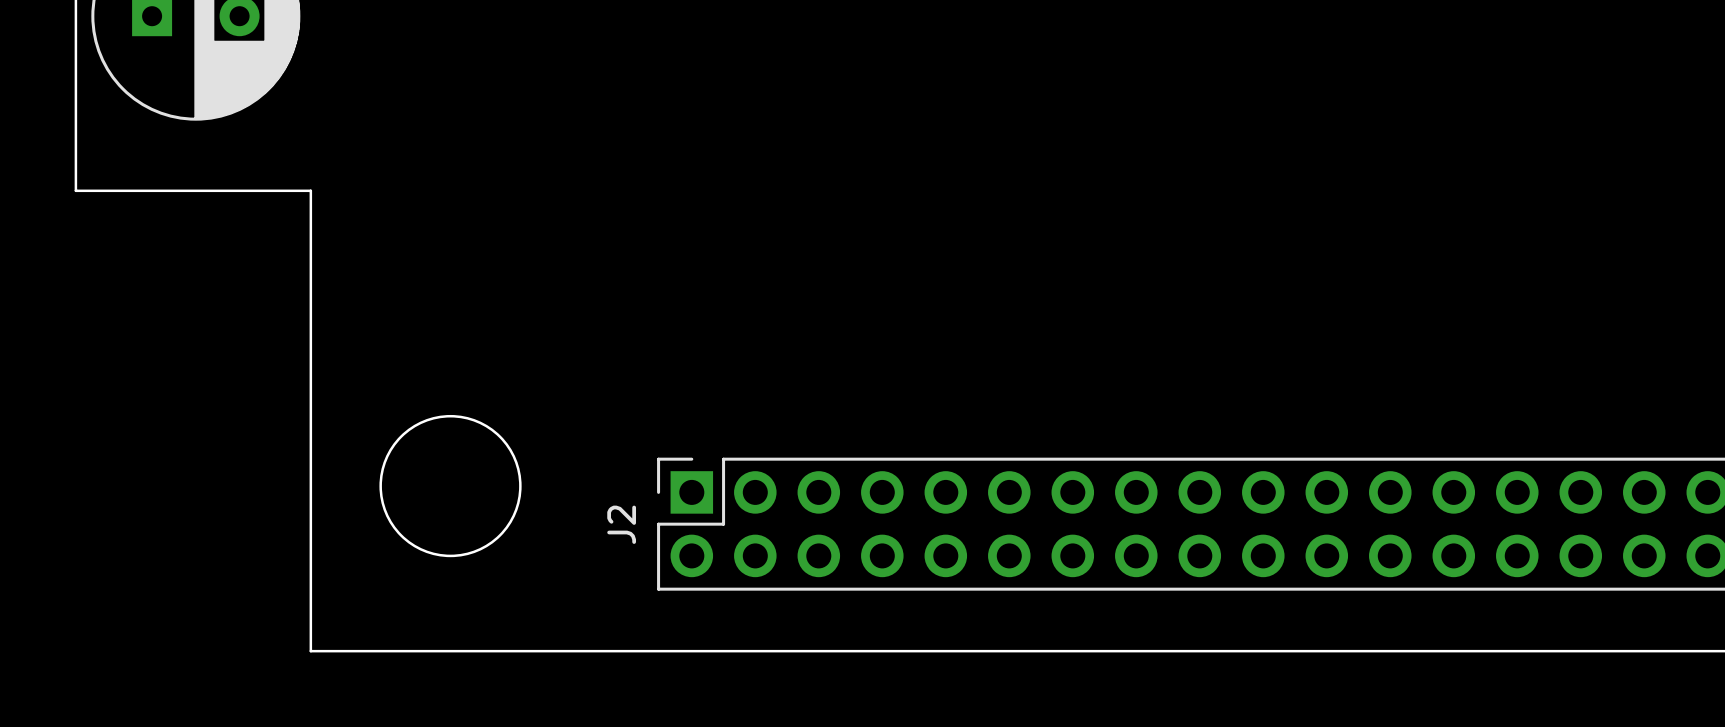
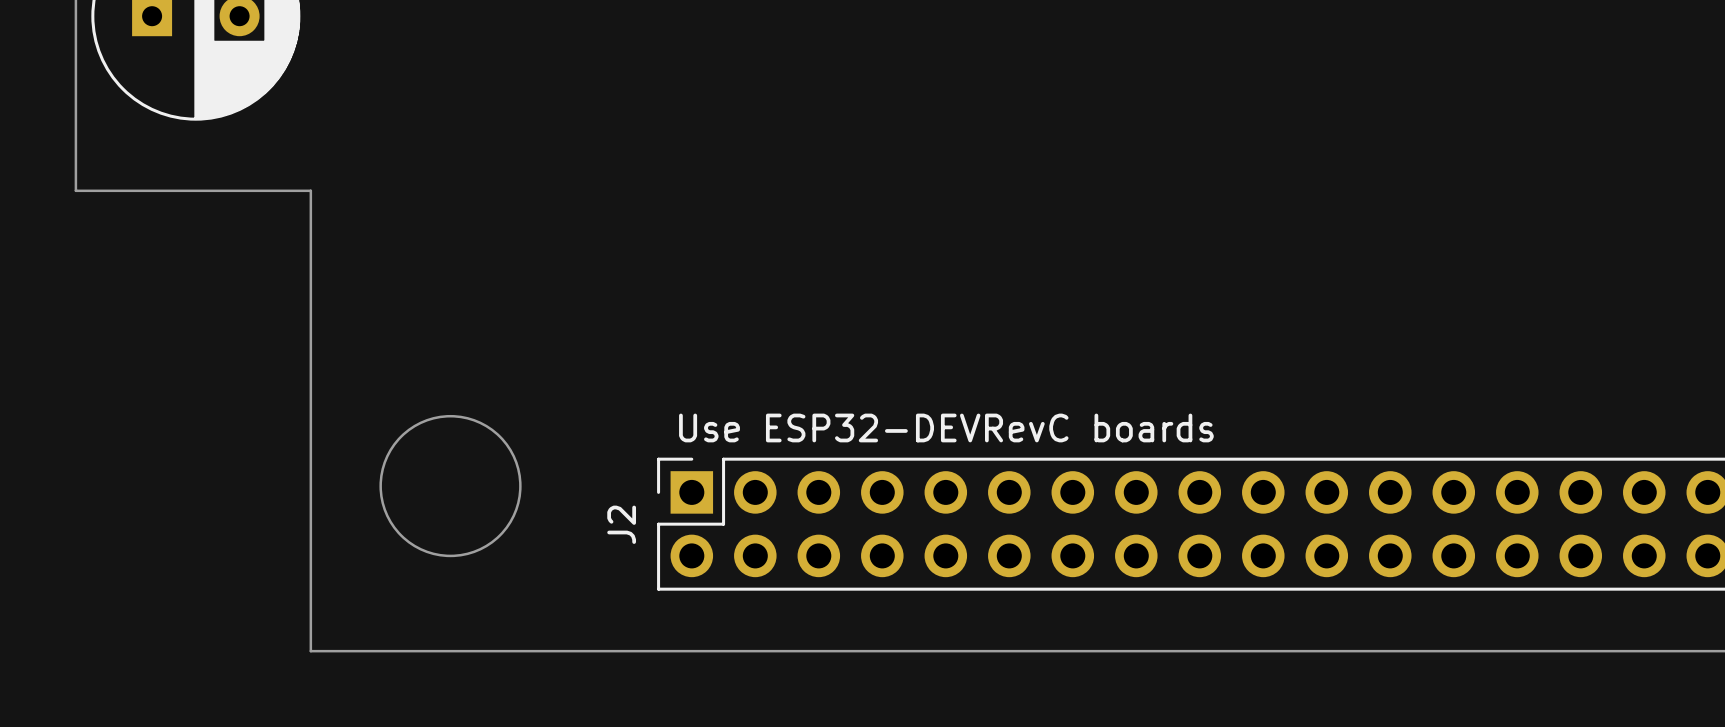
text: none -> Use ESP32-DEVRevC boards (946, 427)

